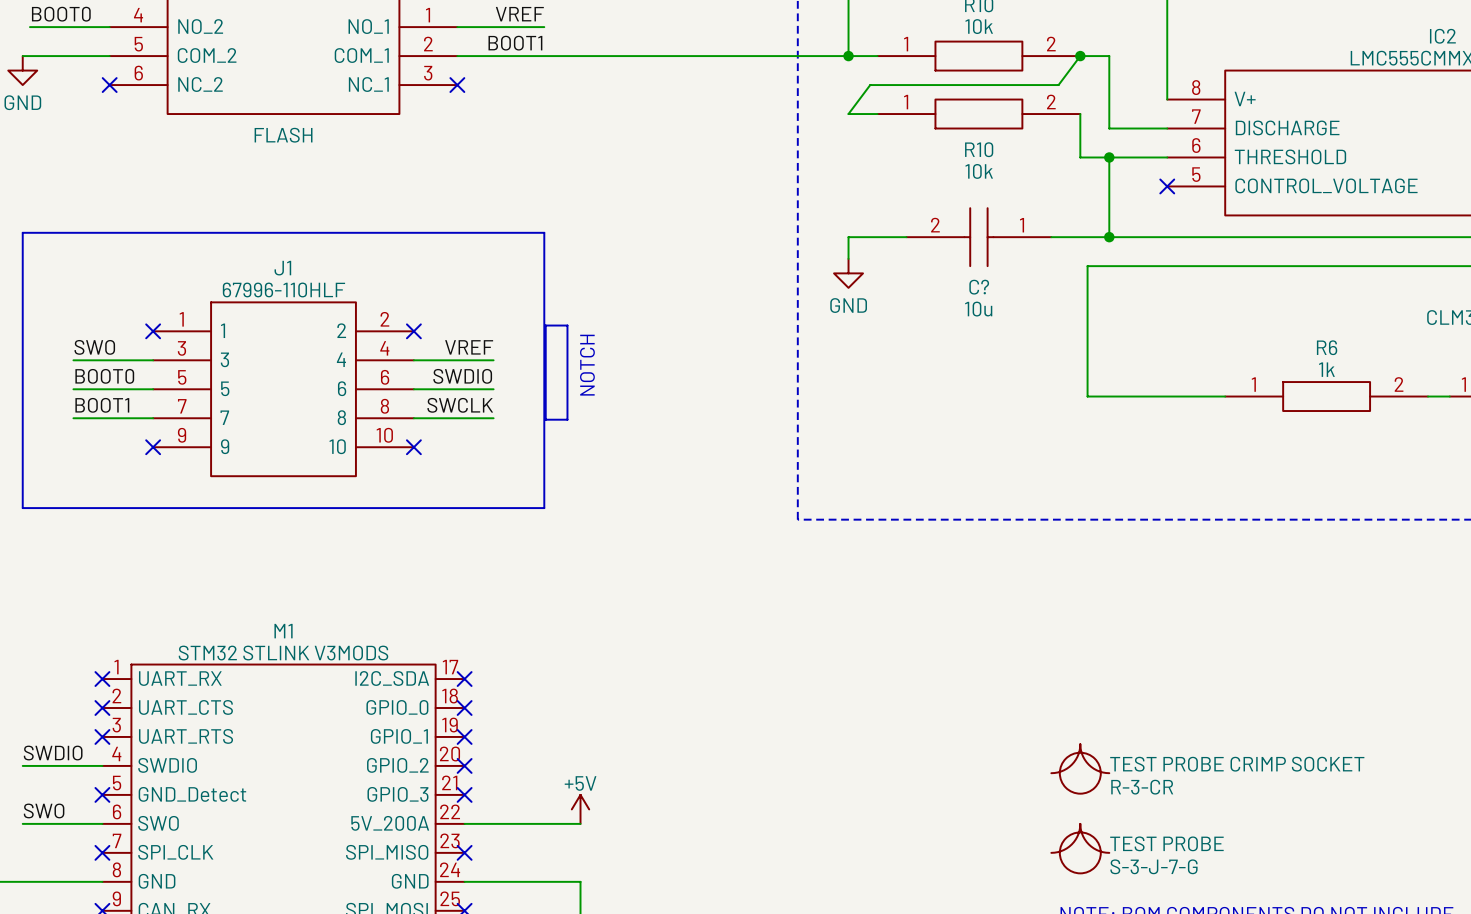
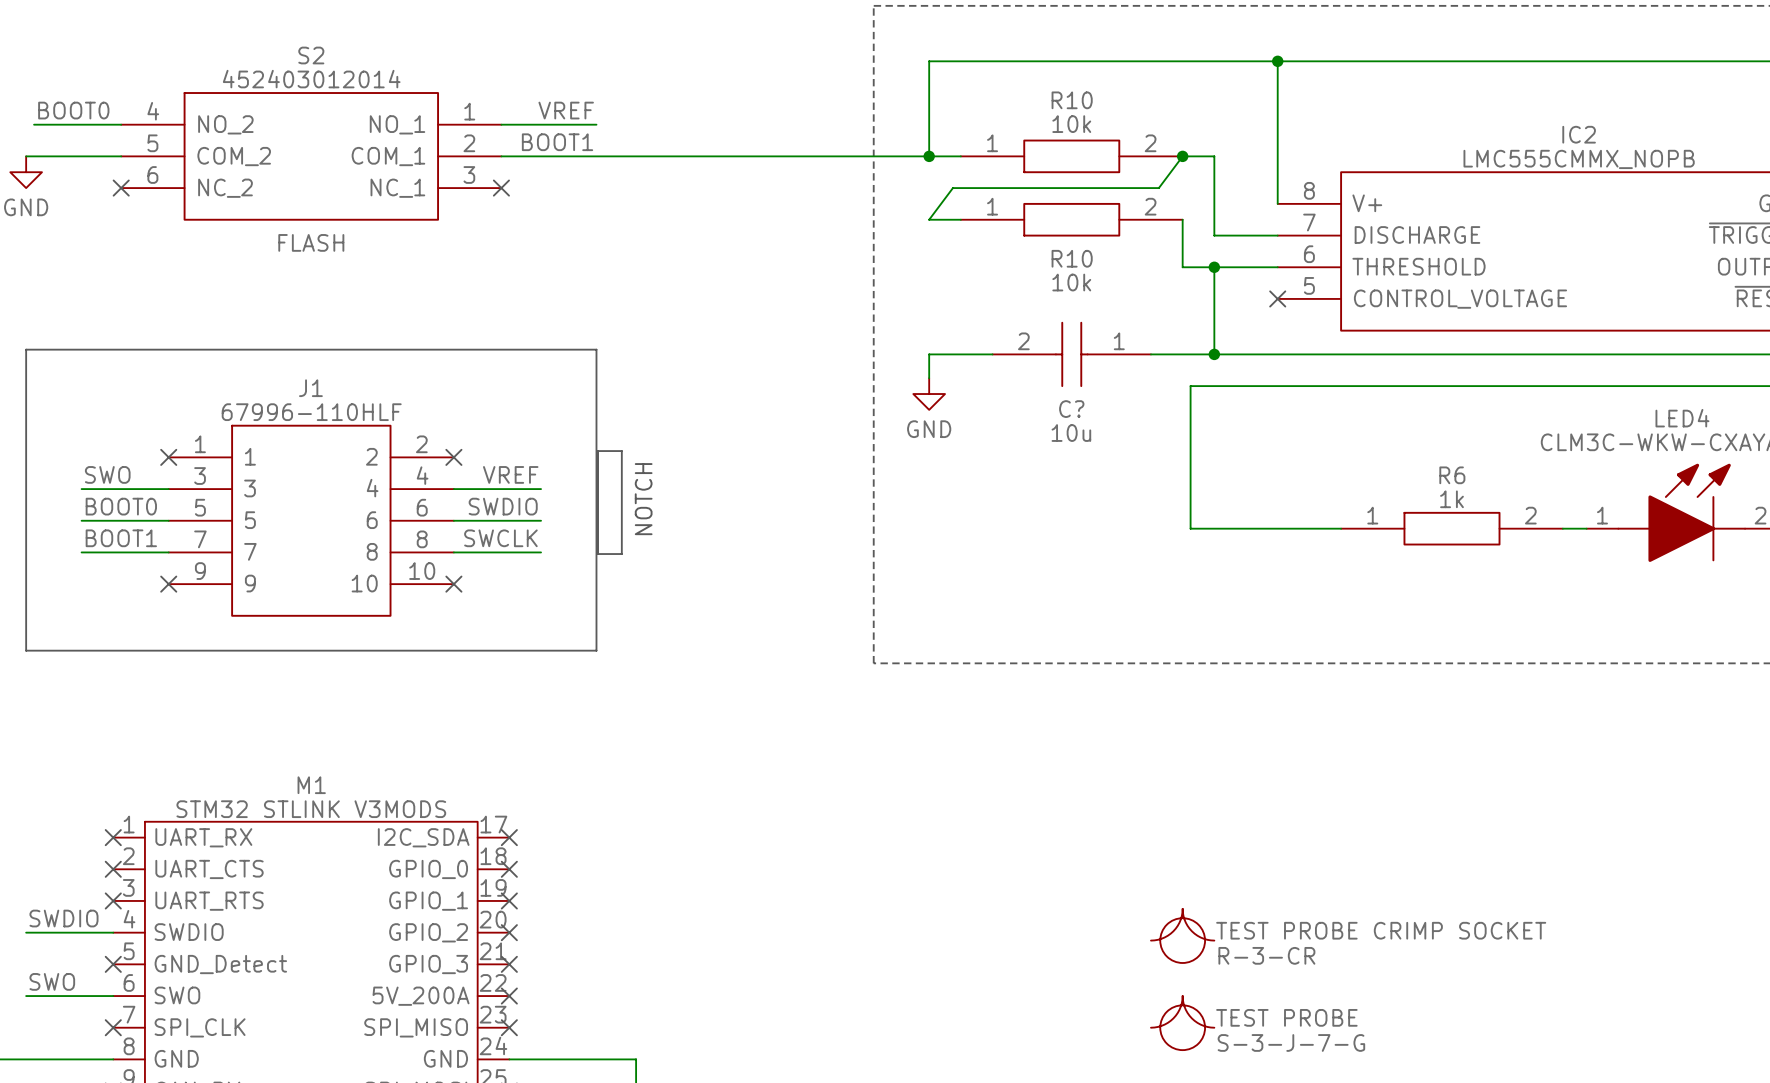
power symbol: +5V (580, 809) -> none
wire: (464, 823) (580, 823) -> none
no-connect mark: none -> (509, 996)

